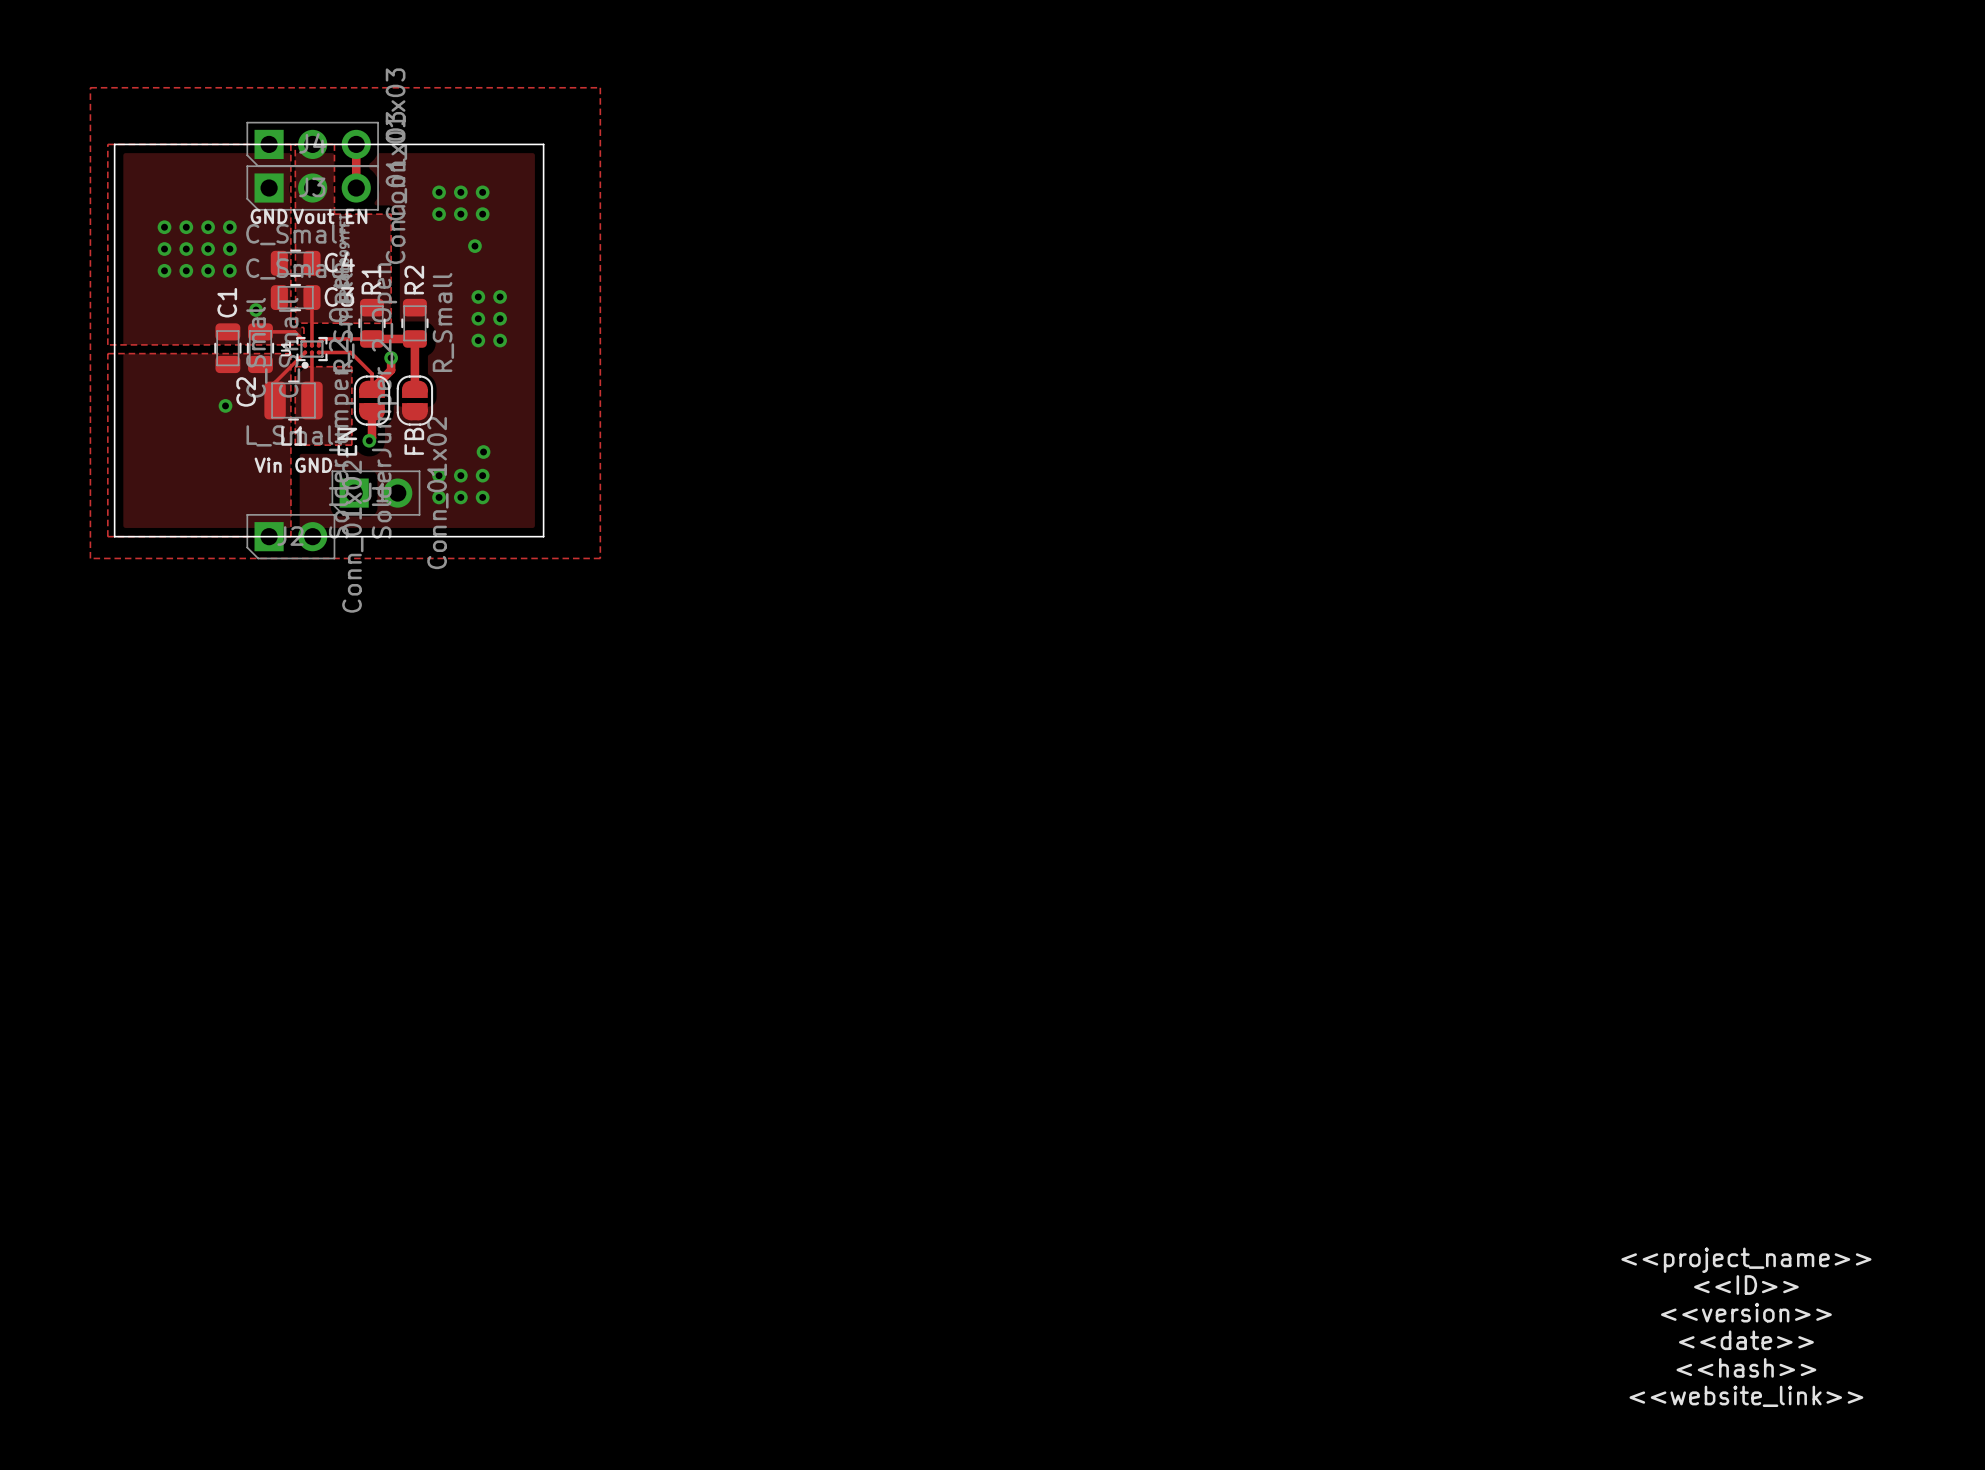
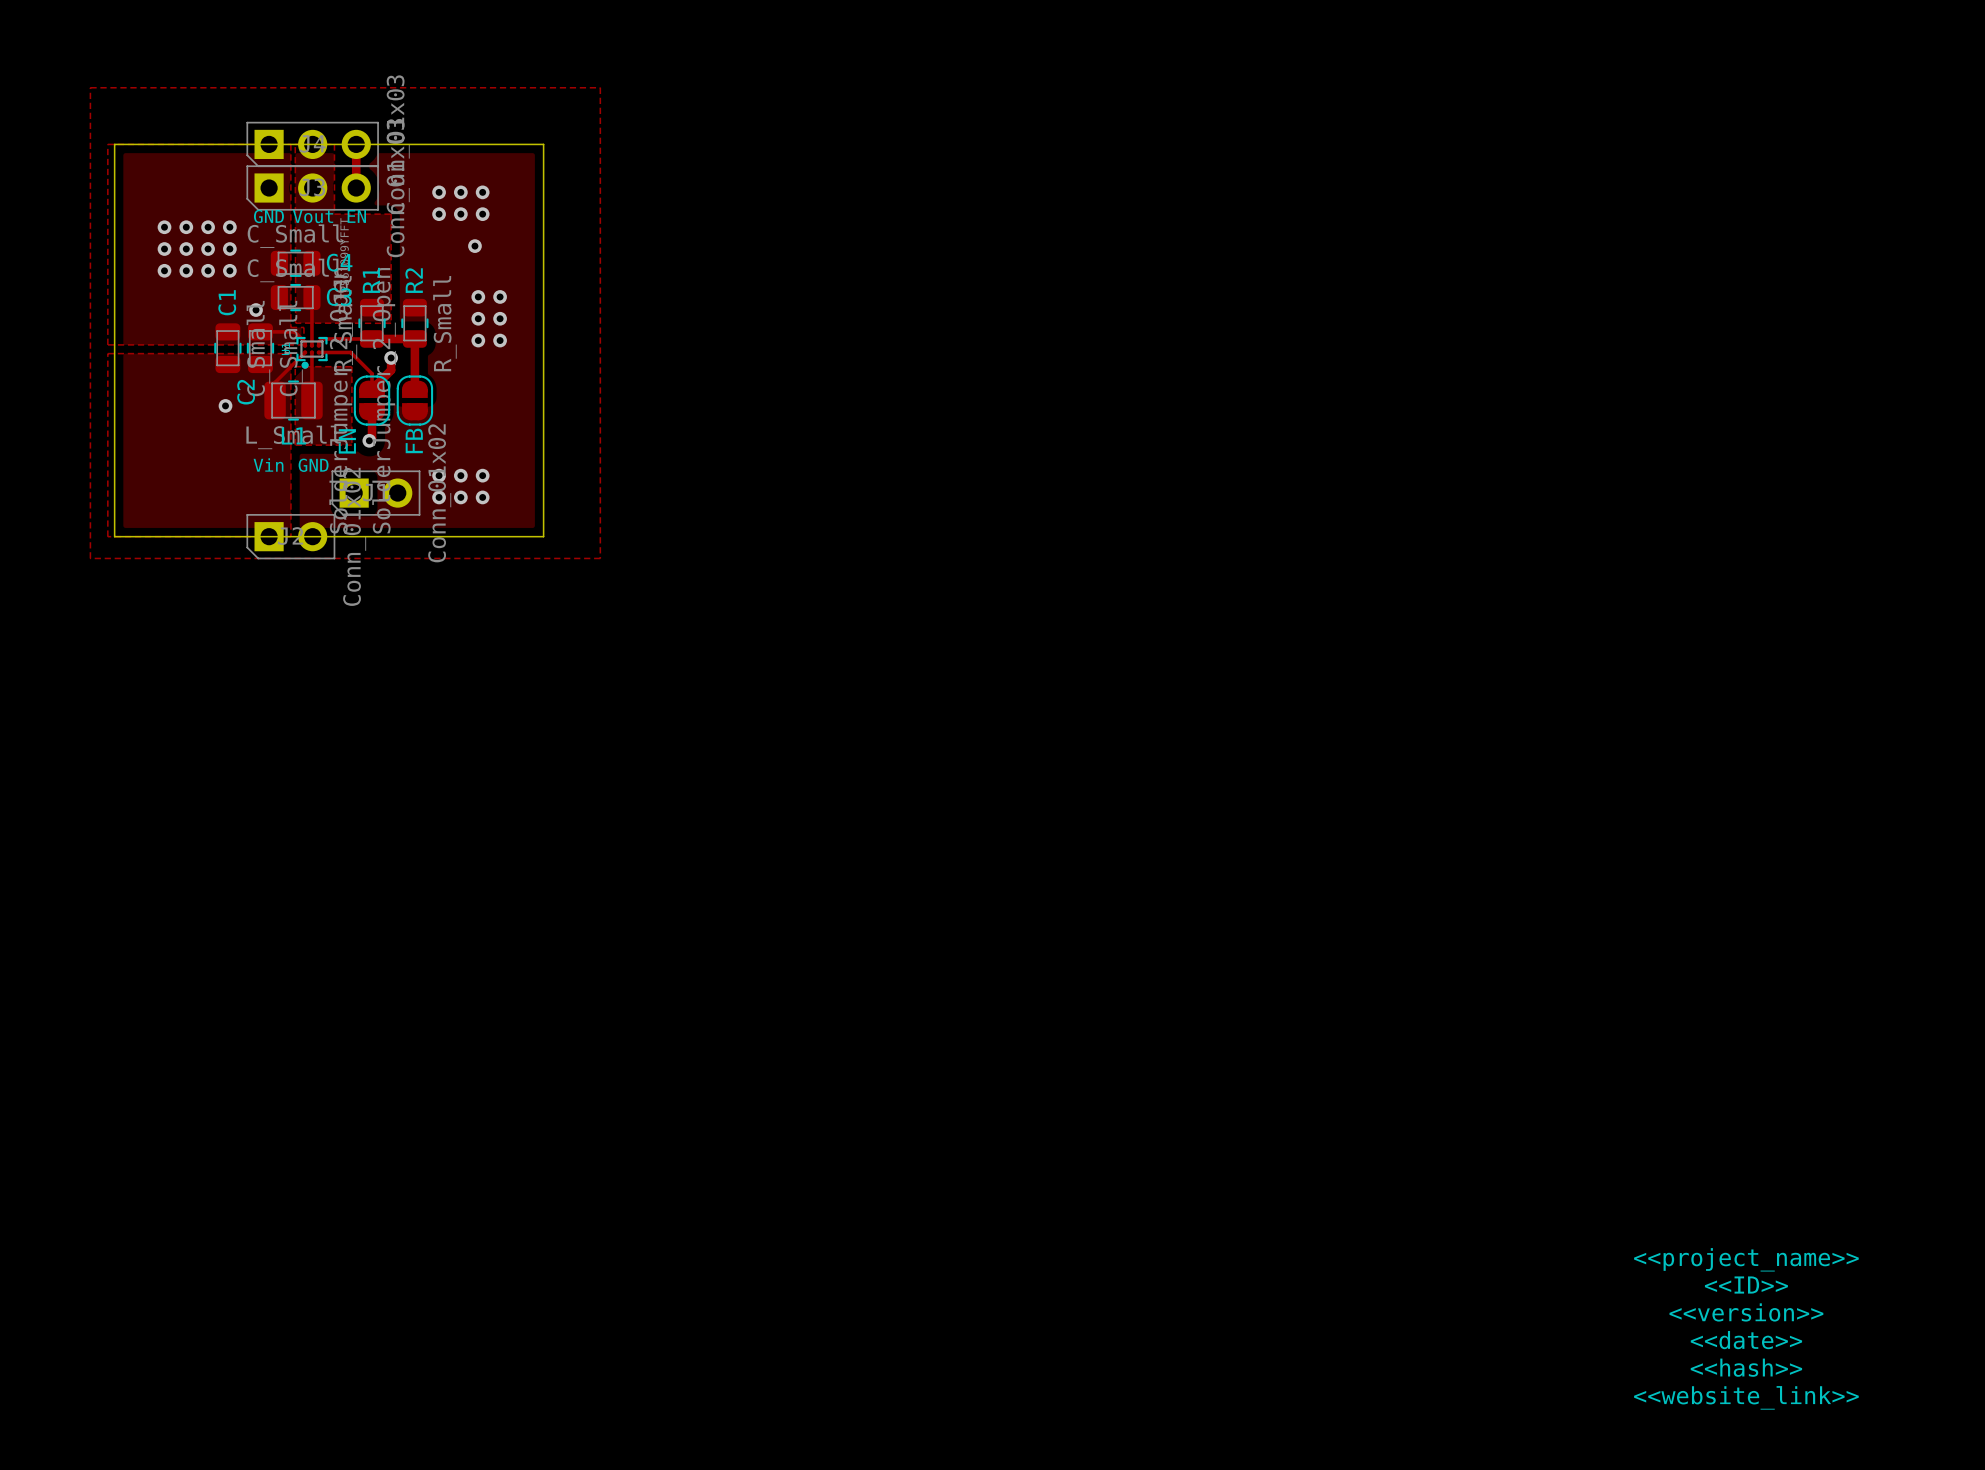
via: (483, 452) -> none

